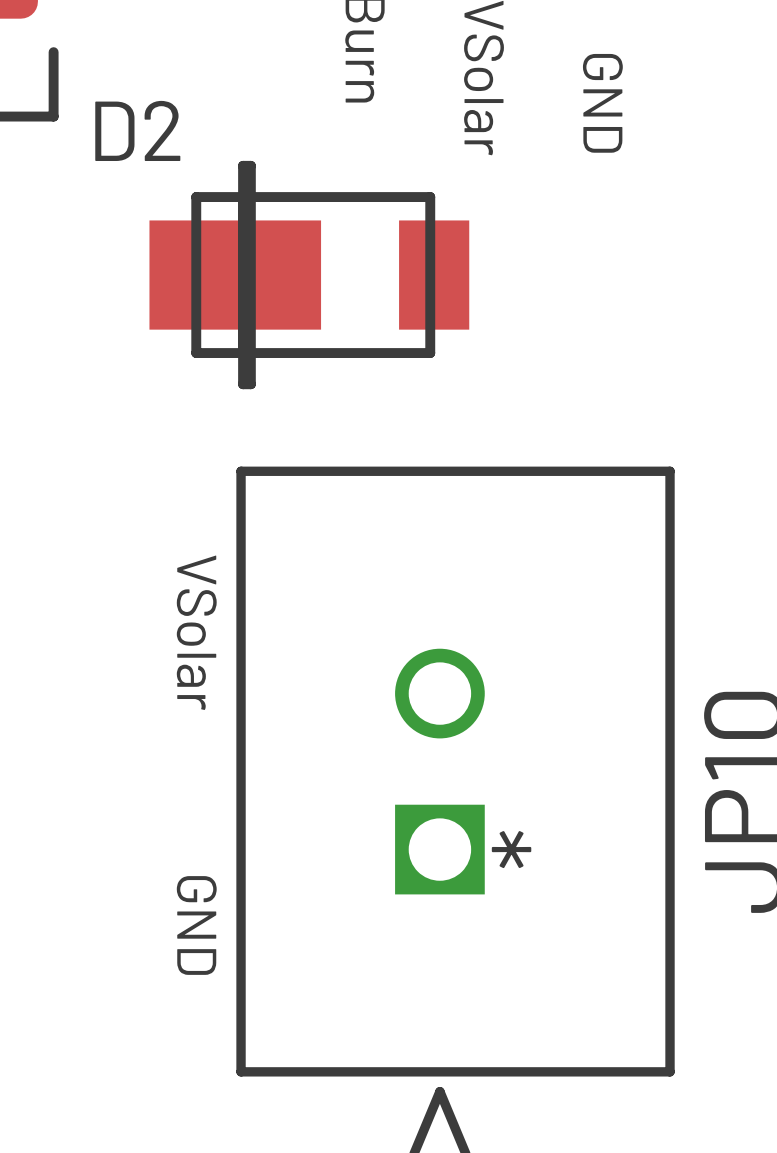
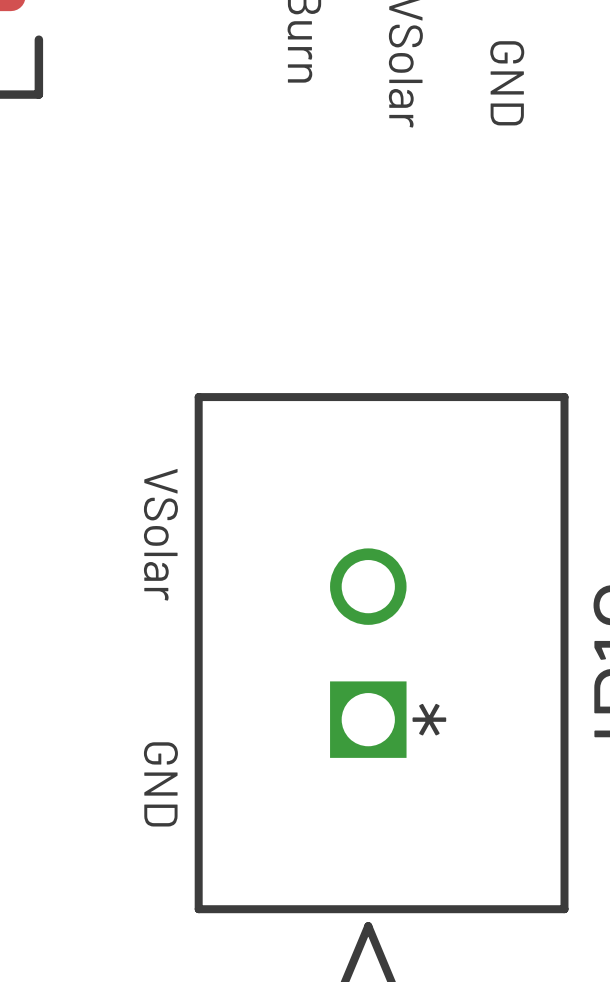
D2: (309, 275) -> none

